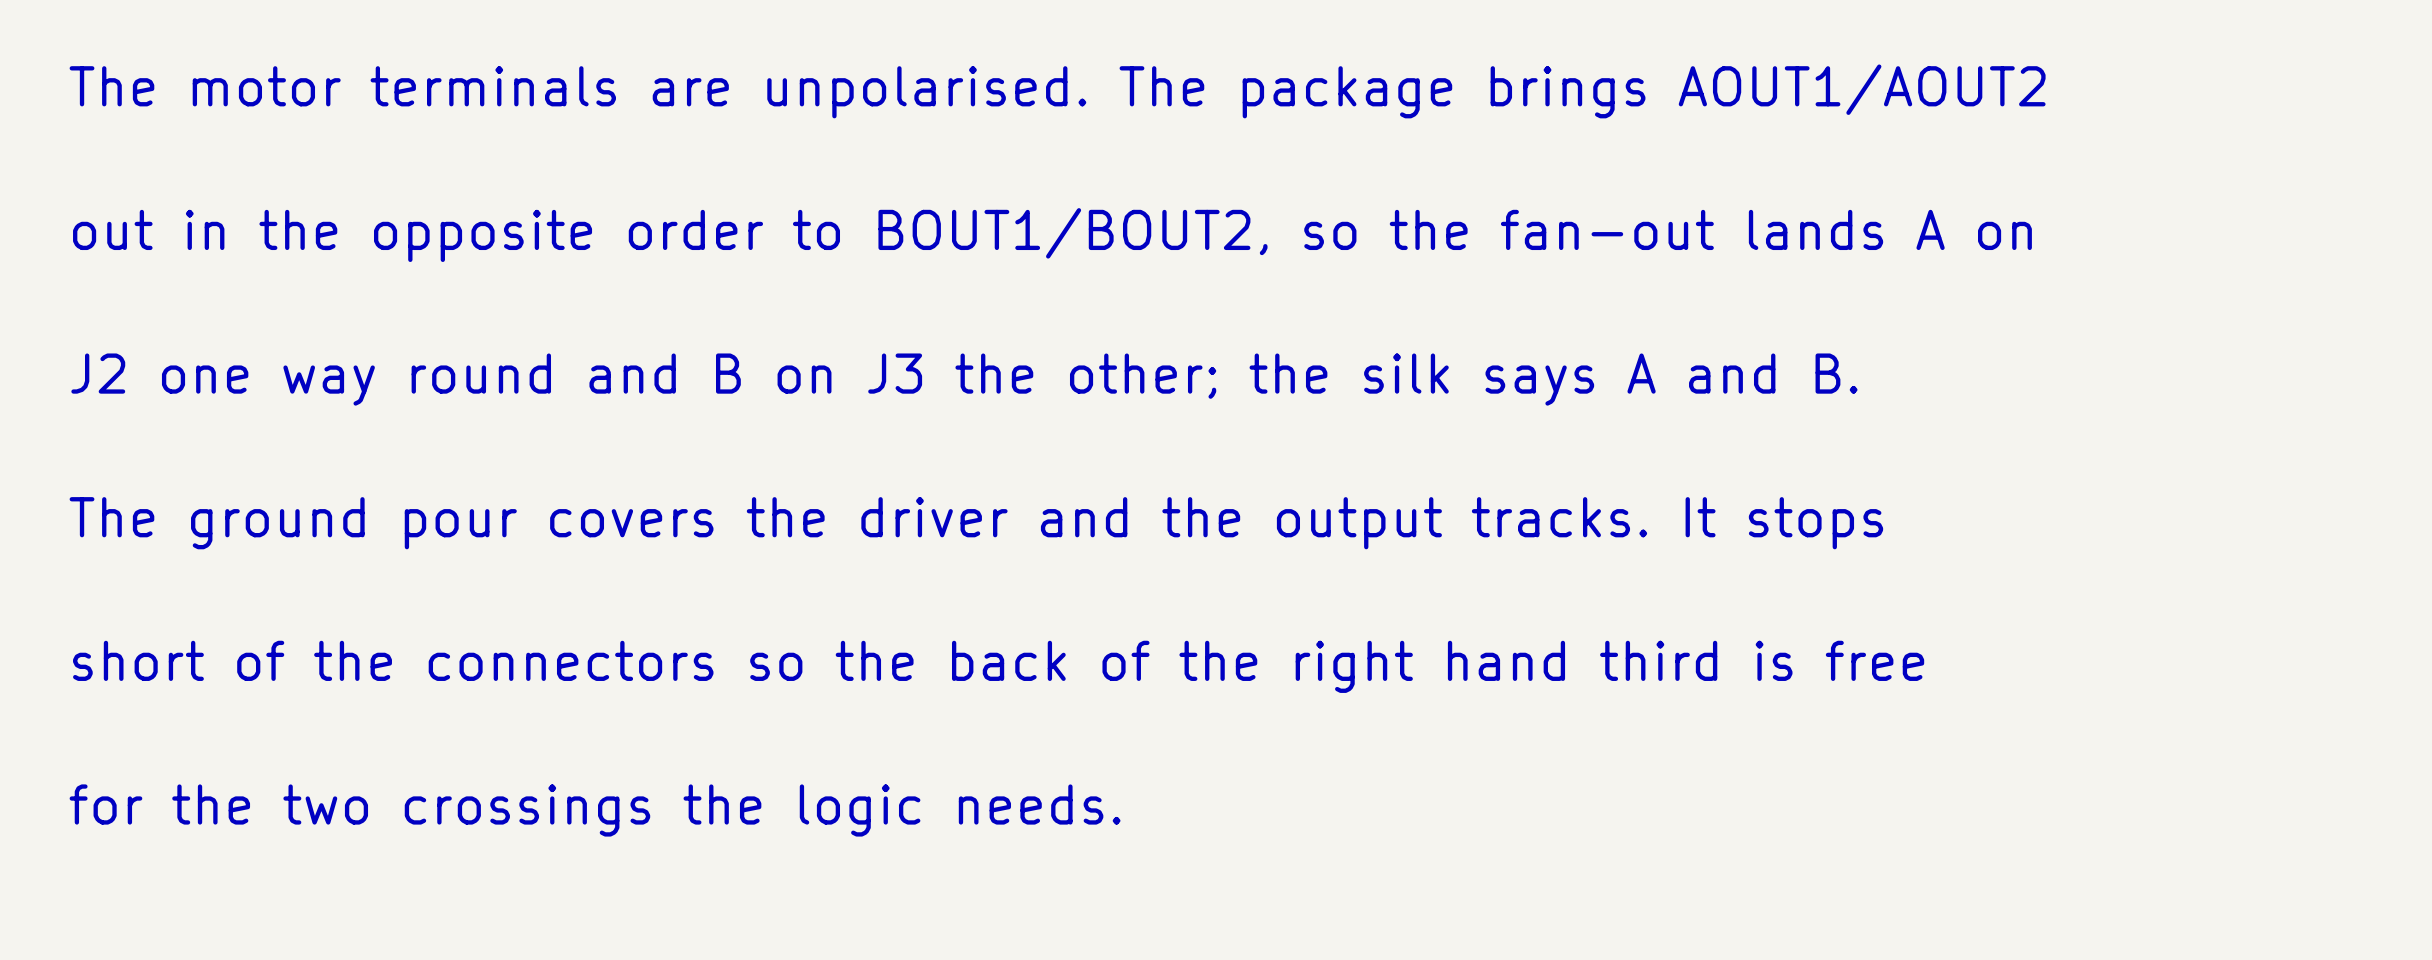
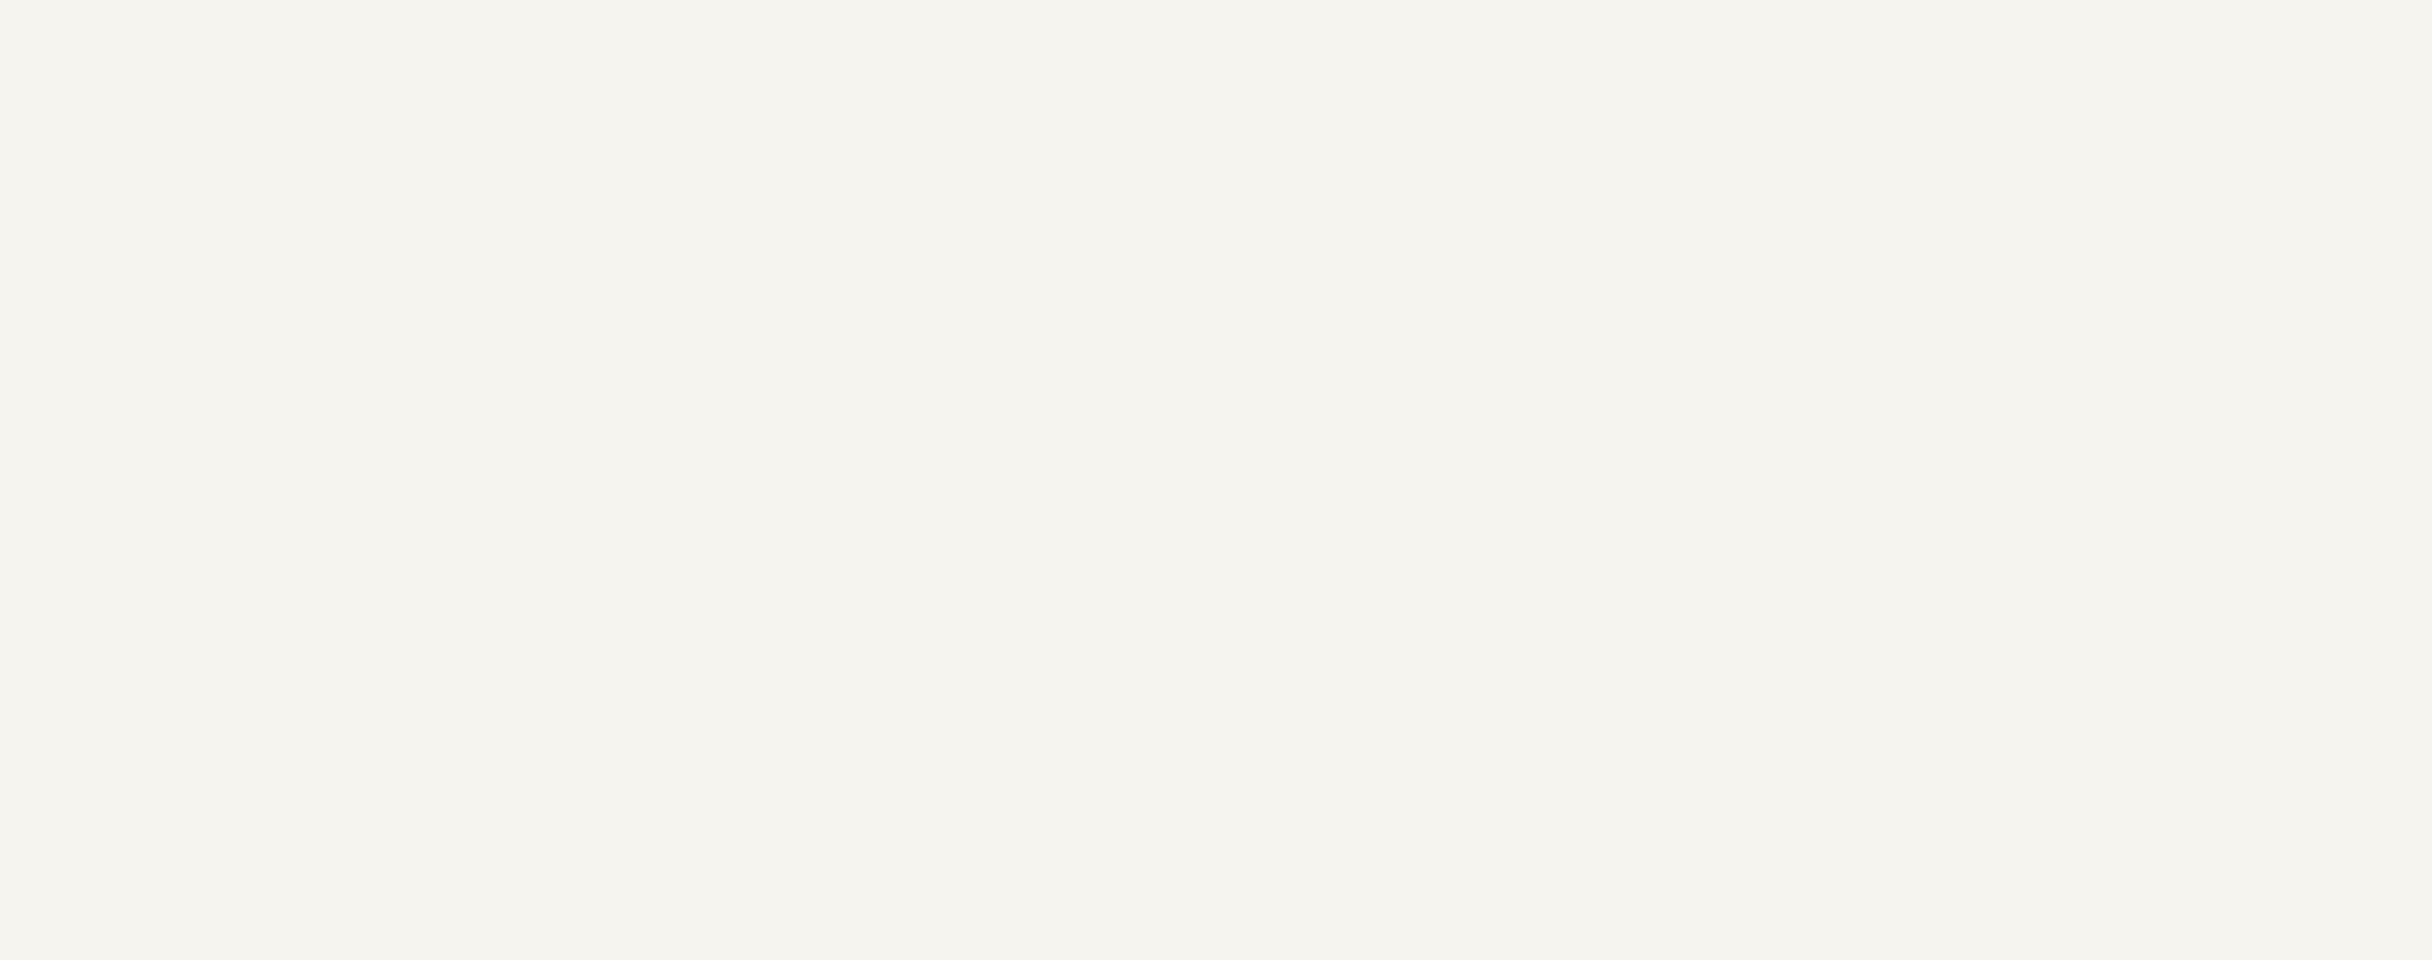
text: The motor terminals are unpolarised. The package brings AOUT1/AOUT2 (1057, 91) -> none
text: out in the opposite order to BOUT1/BOUT2, so the fan-out lands A on (1052, 235) -> none
text: J2 one way round and B on J3 the other; the silk says A and B. (964, 379) -> none
text: The ground pour covers the driver and the output tracks. It stops (976, 523) -> none
text: short of the connectors so the back of the right hand third is free (998, 666) -> none
text: for the two crossings the logic needs. (595, 810) -> none

